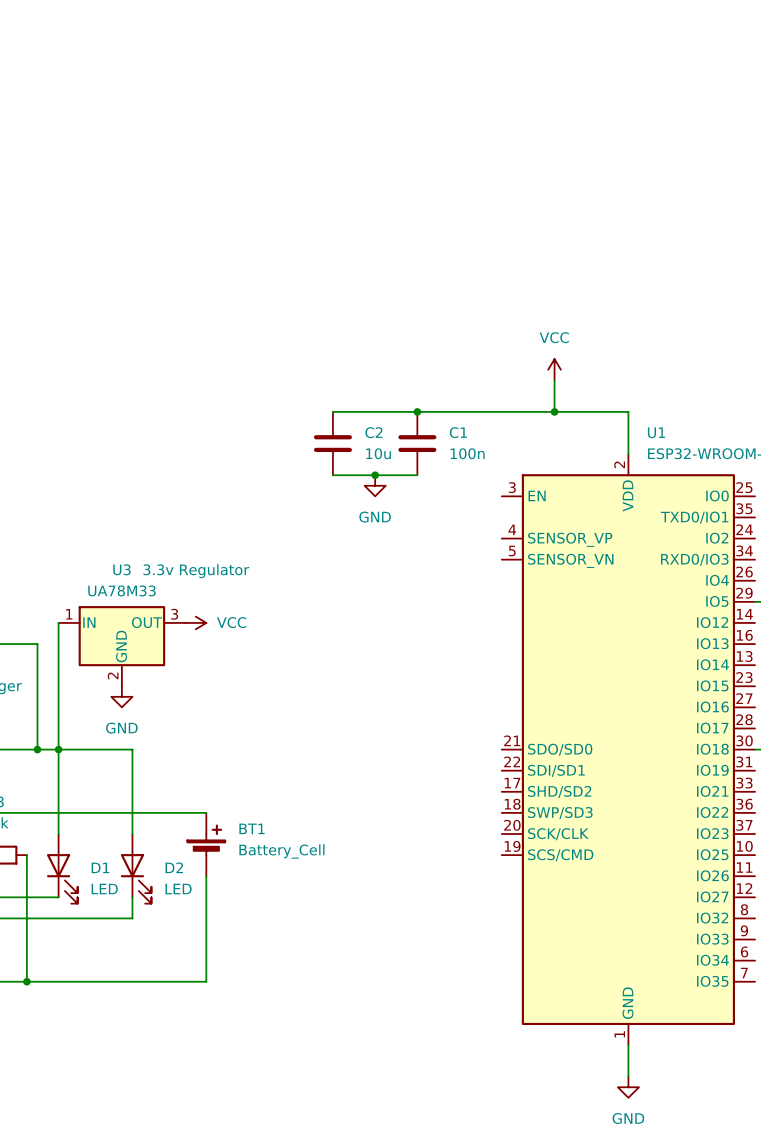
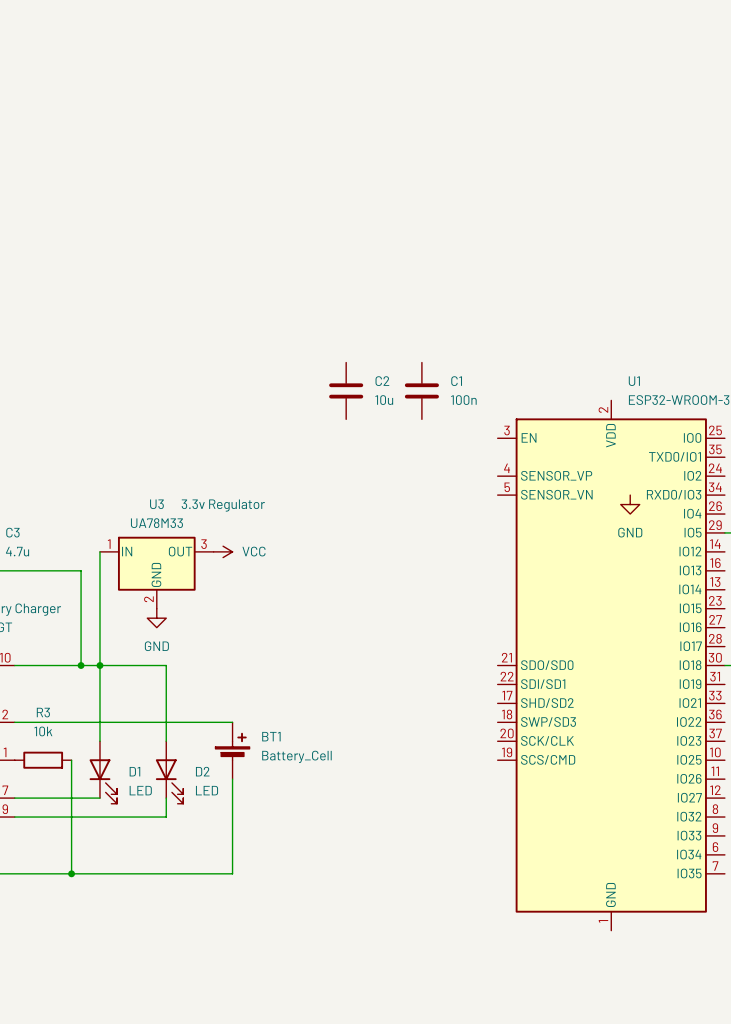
power symbol: VCC (554, 369) -> none
wire: (554, 380) (554, 411) -> none
wire: (332, 411) (628, 411) (628, 454) -> none
junction: (417, 411) -> none
junction: (554, 411) -> none
wire: (332, 475) (417, 475) -> none
junction: (375, 475) -> none
power symbol: GND (375, 485) -> none
power symbol: none -> GND (630, 504)
wire: (628, 1045) (628, 1076) -> none
power symbol: GND (628, 1087) -> none

